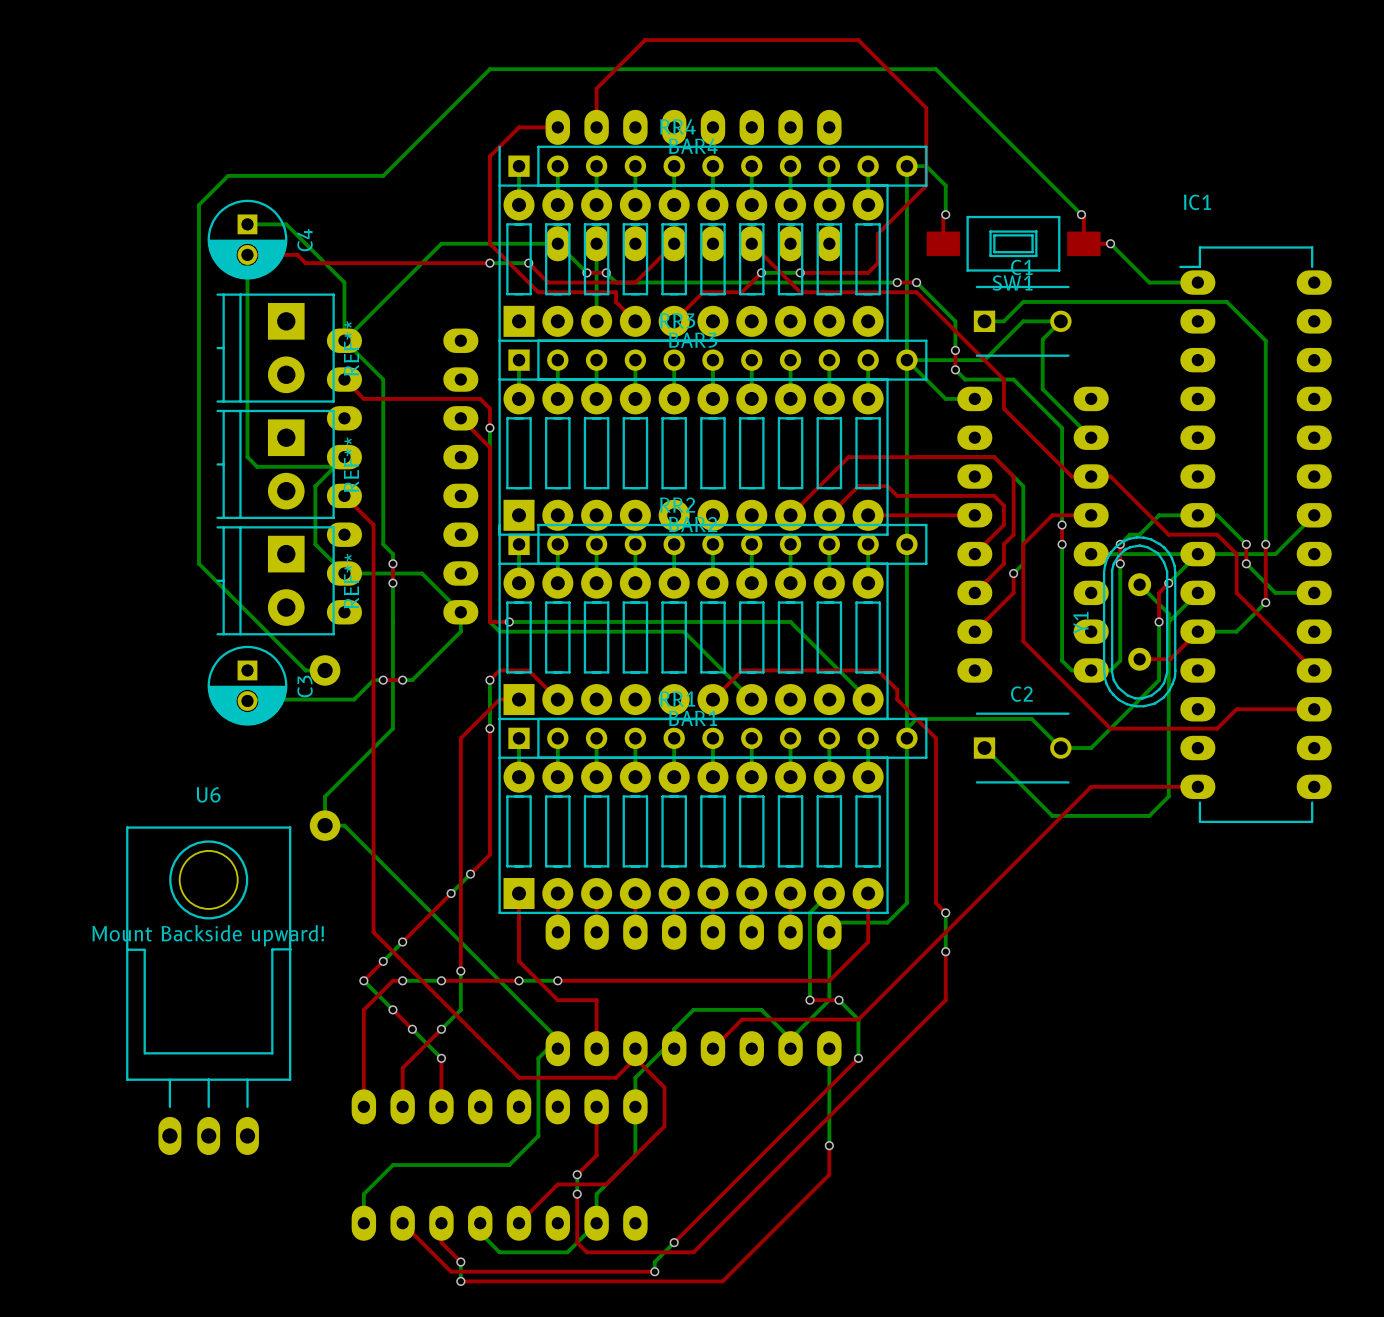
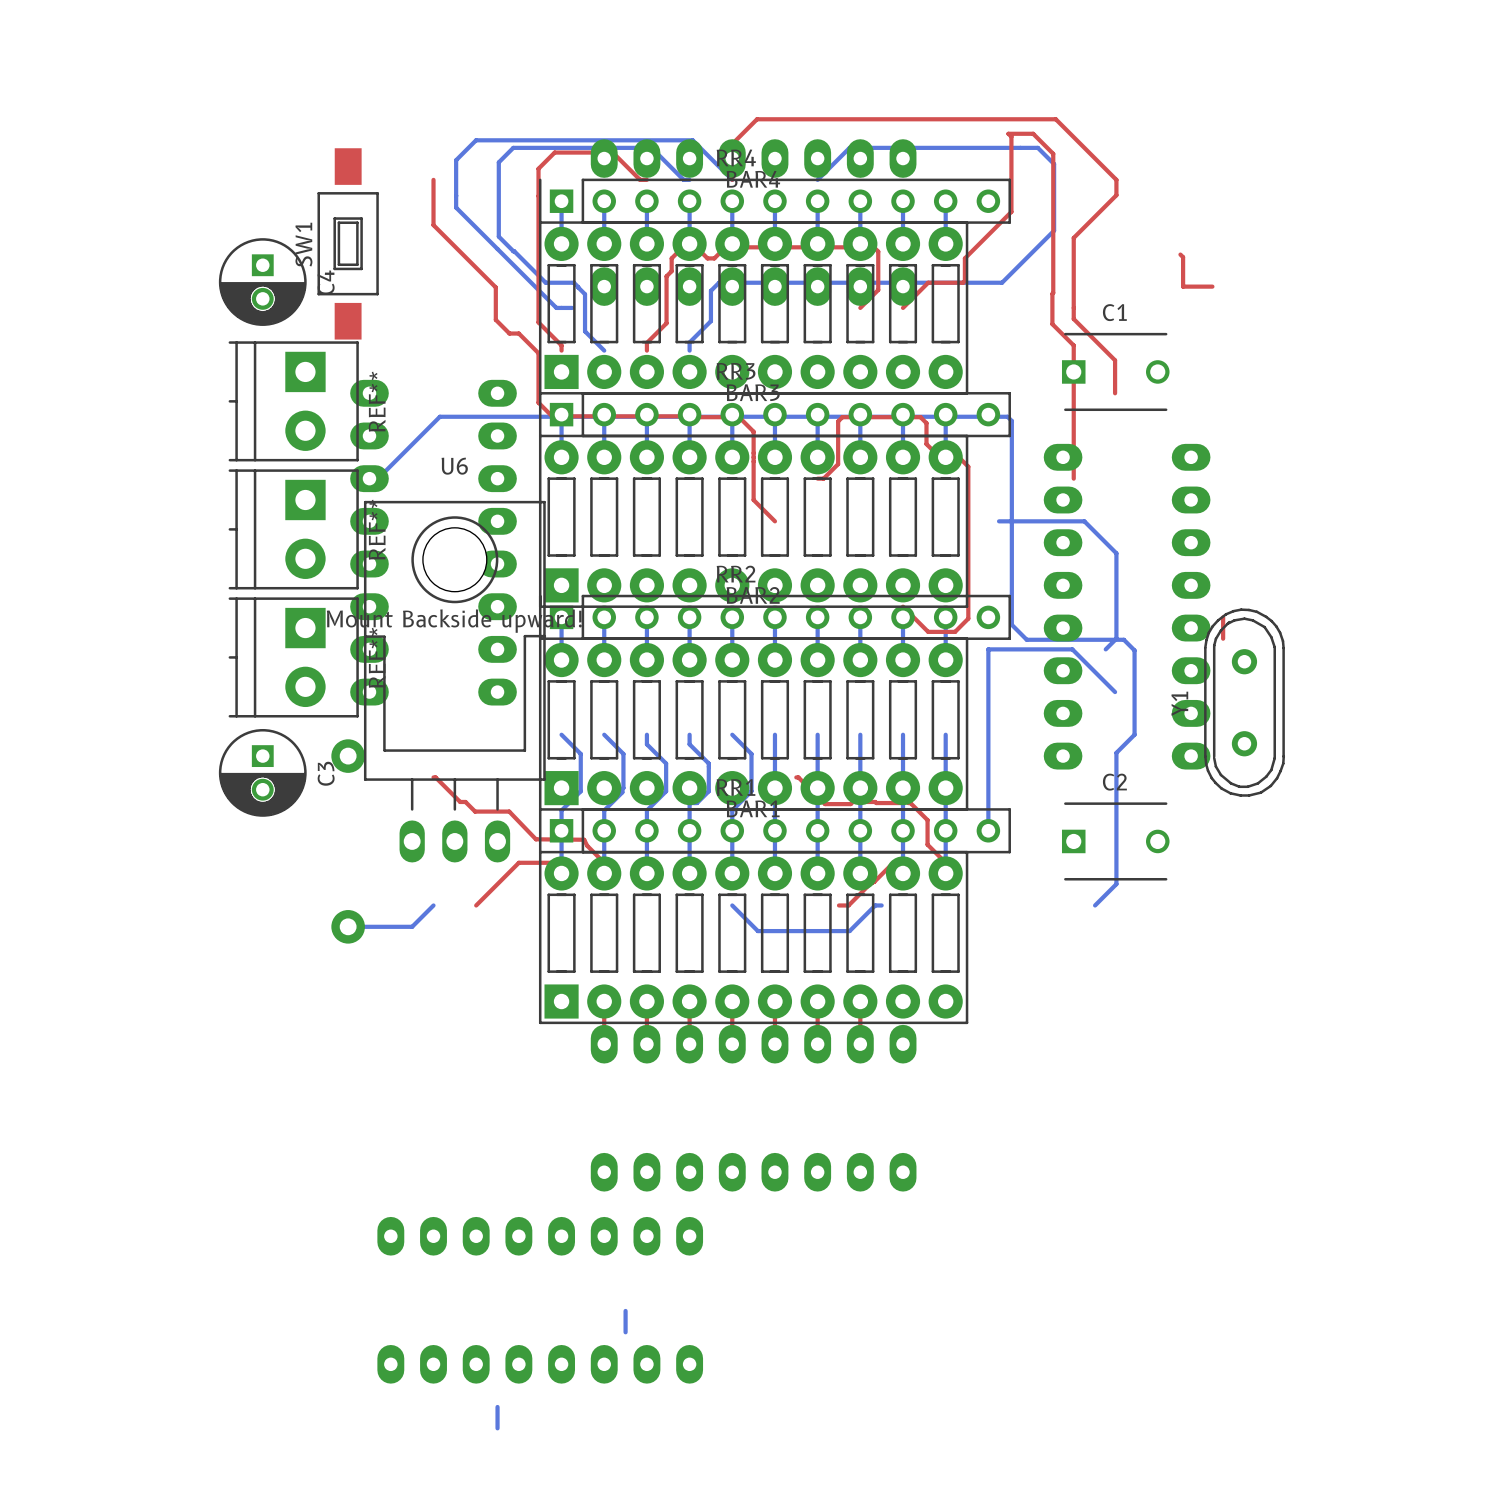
top track: (557, 127) (519, 127) (489, 156) (489, 243) (538, 292) (616, 292) (616, 301) (635, 321) -> none
top track: (596, 127) (596, 88) (645, 40) (858, 40) (926, 108) (926, 185) (877, 234) (877, 263) (868, 272) (800, 272) -> none
top track: none -> (433, 179) (433, 225) (495, 287) (495, 319) (509, 333) (518, 333) (538, 353) (538, 402) (552, 416) (739, 417) (753, 431) (753, 499) (774, 521)
top track: none -> (646, 179) (640, 179) (612, 152) (554, 152) (538, 168) (538, 322) (561, 345) (561, 350)
bottom track: none -> (689, 179) (683, 179) (651, 147) (513, 147) (498, 162) (498, 236) (513, 251)
top track: none -> (732, 179) (732, 144) (757, 119) (1055, 119) (1116, 179) (1116, 195) (1073, 237) (1073, 319) (1115, 360) (1115, 393)
bottom track: none -> (817, 179) (849, 147) (1037, 147) (1054, 164) (1054, 230) (1002, 282) (719, 282) (710, 290) (710, 321) (689, 342) (689, 350)
bottom track: none -> (513, 251) (545, 282) (573, 282) (585, 294) (585, 331) (604, 350)
top track: (945, 214) (943, 217) (943, 243) -> none
bottom track: (945, 214) (945, 185) (926, 166) (906, 166) (906, 573) -> (1115, 692) (1072, 649) (988, 649)
via: (945, 214) -> none
bottom track: (1081, 214) (936, 69) (489, 69) (383, 175) (228, 175) (199, 204) (199, 563) (305, 670) (325, 670) -> none
via: (1081, 214) -> none
bottom track: (247, 224) (286, 224) (344, 282) (344, 340) -> none
bottom track: (596, 243) (596, 321) -> none
top track: (674, 243) (635, 282) (548, 282) (528, 263) -> none
top track: (751, 243) (800, 292) (916, 292) (1003, 379) (1003, 408) (1071, 476) (1110, 476) (1168, 534) (1217, 534) (1236, 554) (1236, 592) (1314, 670) -> none
SW1 rotation: 0° (1013, 243) -> 90° clockwise (348, 243)
SW1 position: (1013, 243) -> (348, 243)
bottom track: (1110, 243) (1149, 282) (1197, 282) -> none
via: (1110, 243) -> none
top track: (247, 254) (297, 254) (305, 263) (489, 263) -> none
bottom track: (247, 254) (247, 457) (257, 466) (334, 466) -> none
bottom track: (489, 263) (514, 263) -> (732, 179) (692, 140) (476, 140) (456, 160) (456, 207) (556, 307)
via: (489, 263) -> none
via: (528, 263) -> none
top track: none -> (860, 307) (878, 290) (878, 251) (873, 247) (725, 247) (714, 258) (707, 258) (696, 247) (682, 247) (671, 258) (671, 271) (666, 276) (666, 323) (646, 342) (646, 350)
top track: none -> (903, 307) (928, 282) (963, 282) (964, 281) (964, 258) (1011, 211) (1011, 136) (1008, 133) (1033, 133) (1053, 153) (1052, 324) (1073, 345) (1073, 478)
top track: (586, 272) (606, 272) -> none
bottom track: (586, 272) (557, 243) (441, 243) (344, 340) -> none
via: (586, 272) -> none
bottom track: (606, 272) (616, 282) (897, 282) -> none
via: (606, 272) -> none
top track: (761, 272) (742, 292) (703, 292) (674, 321) -> none
bottom track: (761, 272) (800, 272) -> none
via: (761, 272) -> none
via: (800, 272) -> none
top track: (897, 282) (916, 282) -> none
via: (897, 282) -> none
bottom track: (916, 282) (955, 321) (955, 350) -> none
via: (916, 282) -> none
bottom track: (984, 321) (1003, 321) (1023, 301) (1226, 301) (1265, 340) (1265, 544) -> none
bottom track: (344, 340) (383, 379) (383, 544) (392, 554) (392, 563) -> none
top track: (955, 350) (955, 369) -> none
via: (955, 350) -> none
bottom track: (955, 369) (965, 379) (1013, 379) (1062, 428) (1062, 525) -> none
via: (955, 369) -> none
top track: (344, 379) (363, 398) (480, 398) (489, 408) (489, 428) -> none
bottom track: (974, 398) (945, 398) (906, 360) (984, 360) (1023, 321) (1060, 321) (1042, 339) (1042, 389) (1091, 437) -> none
bottom track: none -> (369, 478) (378, 478) (439, 416) (1007, 416) (1011, 421) (1011, 624) (1026, 639) (1123, 639) (1134, 650) (1134, 734) (1116, 752) (1116, 884) (1095, 905)
top track: (460, 418) (489, 447) (489, 621) (509, 621) -> none
top track: none -> (817, 478) (823, 478) (838, 464) (838, 421) (842, 417) (920, 417) (926, 423) (926, 444) (935, 453) (955, 453) (968, 466) (968, 618) (955, 631) (928, 631) (903, 606)
bottom track: (489, 428) (489, 621) (499, 631) (683, 631) (751, 699) -> none
via: (489, 428) -> none
bottom track: (344, 457) (315, 486) (315, 544) (344, 573) (422, 573) (460, 612) (460, 631) (412, 680) (402, 680) -> none
top track: (344, 495) (373, 525) (373, 932) (519, 1077) (616, 1077) (635, 1058) -> none
top track: (790, 515) (848, 457) (994, 457) (1013, 476) (1013, 534) (1003, 544) (1003, 563) (974, 592) -> none
top track: (829, 515) (858, 486) (887, 486) (897, 495) (994, 495) (1003, 505) (1003, 525) (974, 554) -> none
top track: (868, 515) (974, 515) -> none
top track: (1091, 515) (1052, 515) (1023, 544) (1023, 641) (1110, 728) (1217, 728) (1236, 709) (1314, 709) -> none
bottom track: (1314, 515) (1275, 554) (1091, 554) -> none
top track: (1062, 525) (1062, 544) -> none
via: (1062, 525) -> none
IC1: (1255, 534) -> none
bottom track: (1062, 544) (1062, 660) (1071, 670) (1110, 670) (1120, 660) (1120, 563) -> none
via: (1062, 544) -> none
bottom track: (1120, 544) (1129, 534) (1139, 534) (1159, 515) (1217, 515) (1246, 544) -> none
via: (1120, 544) -> none
top track: (1246, 544) (1246, 563) -> none
via: (1246, 544) -> none
top track: (1265, 544) (1265, 602) -> none
via: (1265, 544) -> none
bottom track: (1197, 554) (1168, 583) -> none
top track: (392, 563) (392, 583) -> none
via: (392, 563) -> none
via: (1120, 563) -> none
bottom track: (1246, 563) (1275, 592) (1314, 592) -> none
via: (1246, 563) -> none
top track: (1013, 573) (1013, 592) (974, 631) -> none
via: (1013, 573) -> none
bottom track: (392, 583) (392, 728) (325, 796) (325, 825) -> none
via: (392, 583) -> none
top track: (1168, 583) (1159, 592) (1159, 621) -> none
via: (1168, 583) -> none
bottom track: (1139, 584) (1168, 613) (1168, 796) (1149, 815) (1052, 815) (984, 748) -> none
bottom track: (1197, 592) (1168, 621) -> none
bottom track: (1265, 602) (1236, 631) (1197, 631) -> none
via: (1265, 602) -> none
bottom track: (509, 621) (790, 621) (868, 699) -> none
via: (509, 621) -> none
bottom track: (1159, 621) (1159, 680) (1091, 748) (1060, 748) (1031, 718) (916, 718) (906, 728) (906, 903) (887, 922) (829, 922) (829, 1000) (790, 1038) (761, 1009) (693, 1009) (674, 1029) (674, 1038) (635, 1077) (635, 1155) (596, 1194) (596, 1223) (567, 1252) (499, 1252) (480, 1232) (480, 1223) -> none
via: (1159, 621) -> none
top track: (1197, 631) (1170, 659) (1139, 659) -> none
bottom track: none -> (561, 734) (580, 753) (580, 791) (561, 810) (561, 820)
bottom track: none -> (604, 734) (623, 753) (622, 792) (604, 810) (604, 820)
bottom track: none -> (646, 734) (646, 744) (666, 763) (666, 791) (646, 810) (646, 820)
bottom track: none -> (689, 734) (689, 744) (708, 763) (708, 791) (697, 803) (689, 803) (689, 820)
bottom track: none -> (732, 734) (751, 753) (751, 791) (732, 810) (732, 820)
bottom track: none -> (774, 734) (774, 820)
bottom track: none -> (817, 734) (817, 820)
bottom track: none -> (860, 734) (860, 820)
bottom track: none -> (903, 734) (903, 820)
bottom track: none -> (945, 734) (945, 820)
top track: (383, 680) (402, 680) -> none
bottom track: (383, 680) (373, 680) (354, 699) (247, 701) -> none
via: (383, 680) -> none
via: (402, 680) -> none
top track: (489, 680) (499, 670) (528, 670) (557, 699) -> none
bottom track: (489, 680) (489, 728) -> none
via: (489, 680) -> none
top track: none -> (433, 777) (460, 801) (465, 801) (475, 811) (509, 811) (535, 839) (584, 839) (587, 845) (604, 862)
top track: none -> (796, 777) (825, 804) (850, 804) (852, 801) (910, 803) (927, 820) (927, 844) (945, 862)
top track: (519, 699) (499, 699) (460, 738) (460, 971) -> none
top track: (712, 699) (742, 670) (877, 670) (897, 689) (897, 699) (936, 738) (936, 903) (945, 912) -> none
top track: (489, 728) (489, 854) (470, 874) -> none
via: (489, 728) -> none
top track: none -> (561, 862) (518, 862) (476, 905)
top track: none -> (903, 862) (893, 862) (848, 905) (838, 905)
top track: (1197, 786) (1091, 786) (858, 1019) (742, 1019) (712, 1048) -> none
bottom track: none -> (732, 905) (757, 931) (849, 931) (875, 905) (881, 905)
bottom track: (344, 825) (557, 1038) (538, 1058) (538, 1135) (509, 1165) (392, 1165) (363, 1194) (363, 1223) -> (369, 926) (412, 926) (433, 905)
bottom track: (470, 874) (451, 893) -> none
via: (470, 874) -> none
top track: (451, 893) (402, 942) -> none
via: (451, 893) -> none
top track: (519, 893) (519, 961) (557, 1000) (596, 1000) (596, 1048) -> none
bottom track: (829, 893) (809, 912) (809, 1000) -> none
top track: (868, 893) (868, 942) (829, 980) (557, 980) -> none
bottom track: (945, 912) (945, 951) -> none
via: (945, 912) -> none
bottom track: (402, 942) (383, 961) -> none
via: (402, 942) -> none
top track: (945, 951) (945, 1000) (693, 1252) (586, 1252) (577, 1242) (577, 1194) -> none
via: (945, 951) -> none
top track: (383, 961) (363, 980) -> none
via: (383, 961) -> none
bottom track: (460, 971) (460, 1009) (441, 1029) -> none
via: (460, 971) -> none
bottom track: (363, 980) (392, 1009) -> none
via: (363, 980) -> none
top track: (402, 980) (392, 980) (363, 1009) (363, 1106) -> none
bottom track: (402, 980) (441, 980) -> none
via: (402, 980) -> none
top track: (441, 980) (519, 980) -> none
via: (441, 980) -> none
bottom track: (519, 980) (557, 980) -> none
via: (519, 980) -> none
via: (557, 980) -> none
U6 position: (208, 990) -> (455, 681)
top track: (809, 1000) (839, 1000) -> none
via: (809, 1000) -> none
bottom track: (839, 1000) (858, 1019) (858, 1058) -> none
via: (839, 1000) -> none
top track: (392, 1009) (412, 1029) -> none
via: (392, 1009) -> none
bottom track: (412, 1029) (441, 1058) -> none
via: (412, 1029) -> none
top track: (441, 1029) (402, 1068) (402, 1106) -> none
via: (441, 1029) -> none
bottom track: (829, 1048) (829, 1145) -> none
top track: (441, 1058) (441, 1106) -> none
via: (441, 1058) -> none
top track: (635, 1058) (664, 1087) (664, 1126) (606, 1184) (557, 1184) (519, 1223) -> none
top track: (858, 1058) (674, 1242) -> none
via: (858, 1058) -> none
top track: (596, 1106) (596, 1155) (577, 1174) -> none
top track: (829, 1145) (829, 1174) (722, 1281) (460, 1281) -> none
via: (829, 1145) -> none
via: (577, 1174) -> none
via: (577, 1194) -> none
top track: (402, 1223) (451, 1271) (654, 1271) -> none
top track: (441, 1223) (441, 1242) (460, 1262) -> none
bottom track: (674, 1242) (654, 1262) (654, 1271) -> none
via: (674, 1242) -> none
via: (460, 1262) -> none
via: (654, 1271) -> none
via: (460, 1281) -> none

